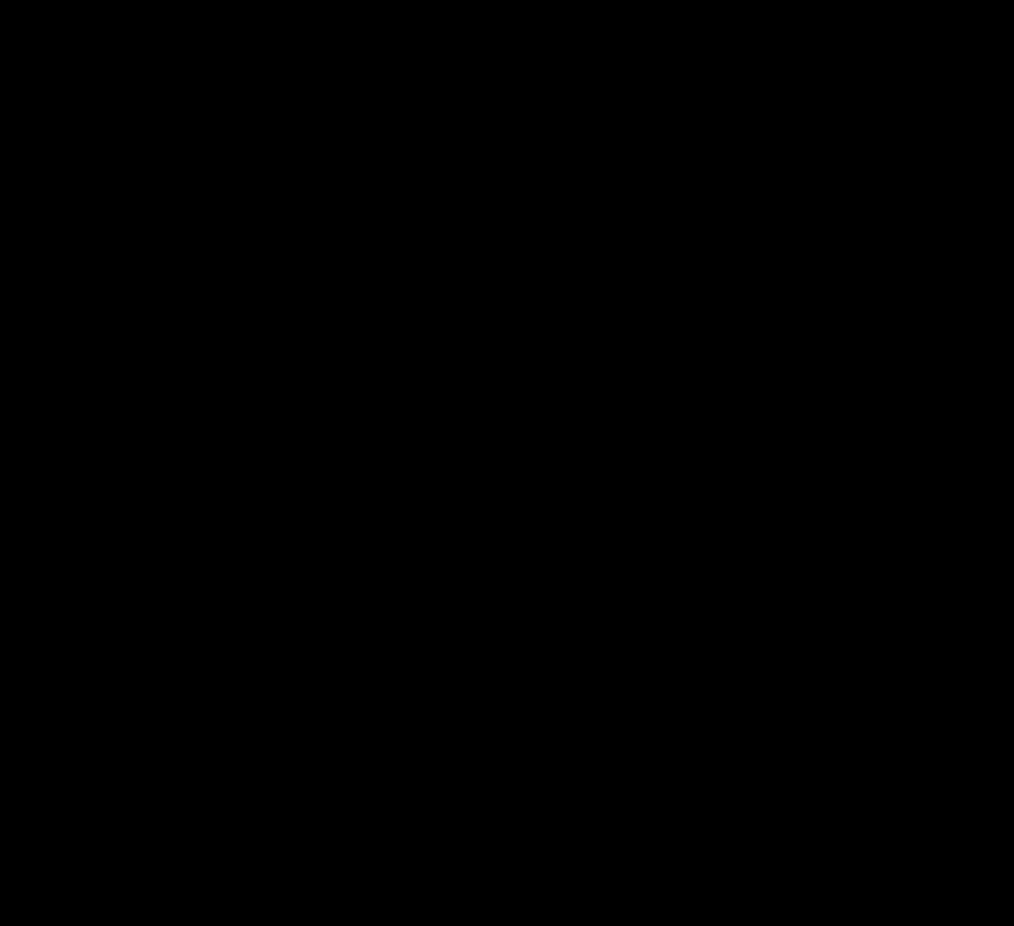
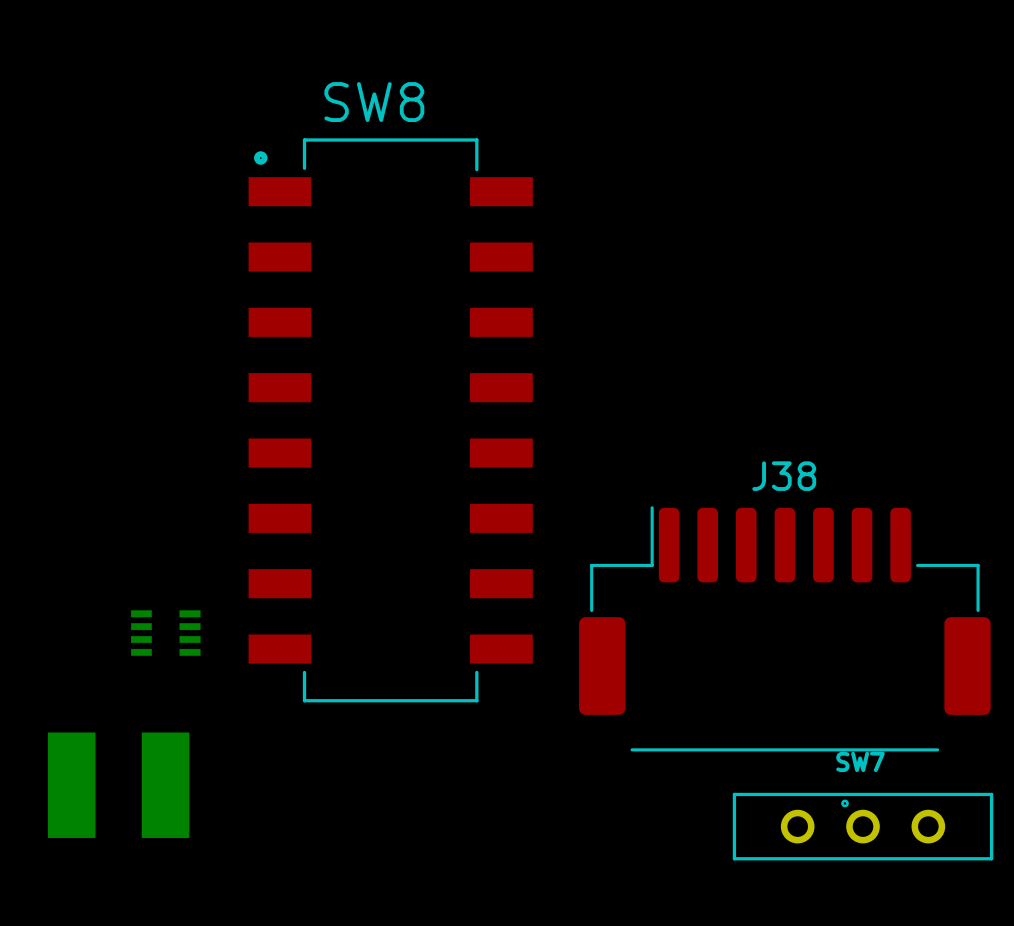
SW8: none -> (390, 420)
J38: none -> (784, 628)
part: none -> (165, 633)
part: none -> (118, 785)
SW7: none -> (863, 826)

